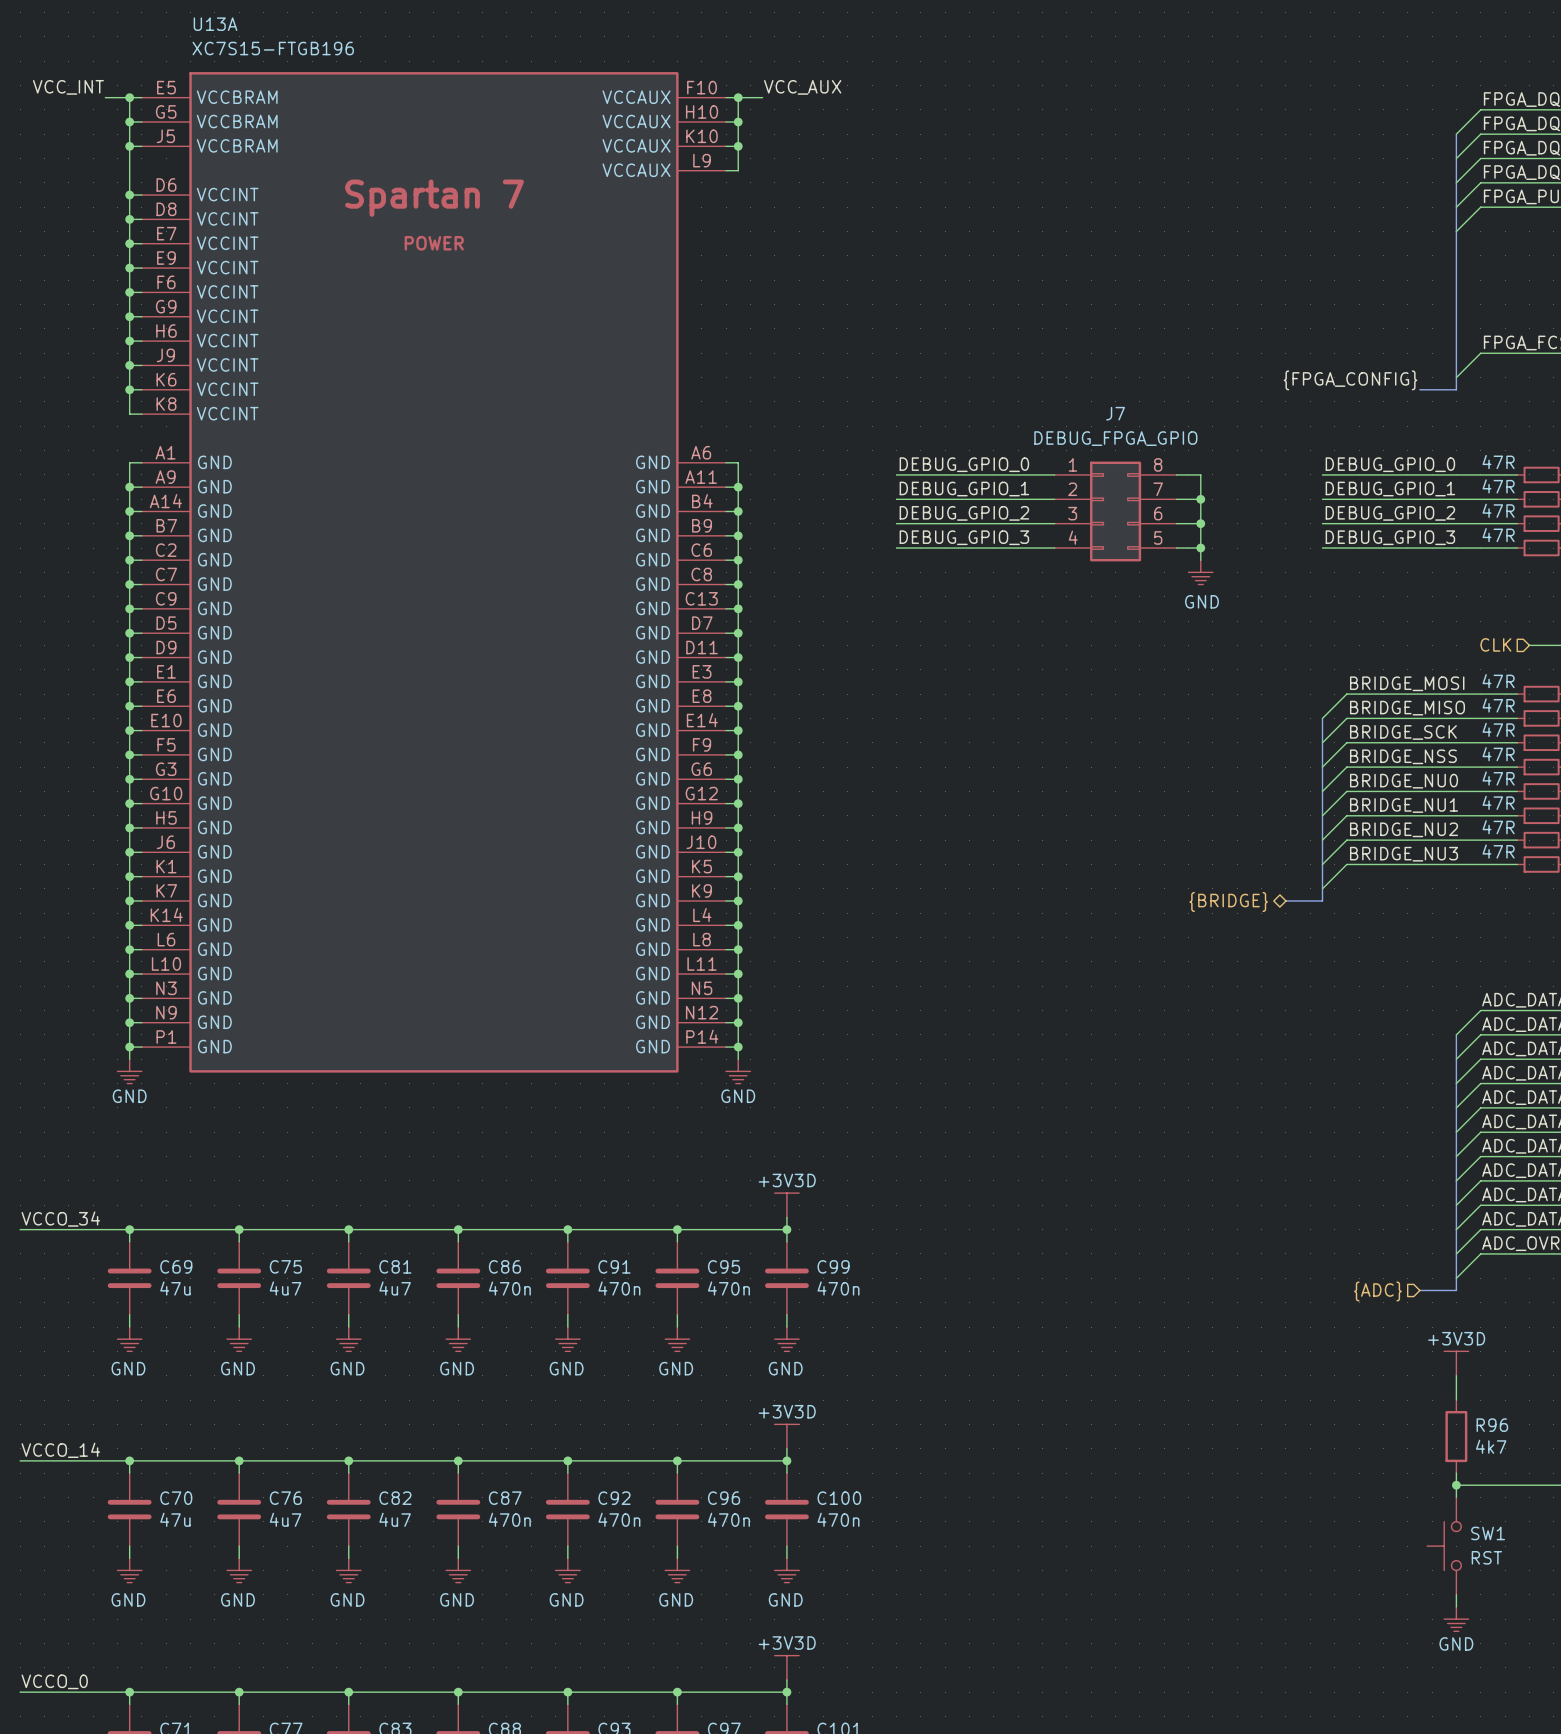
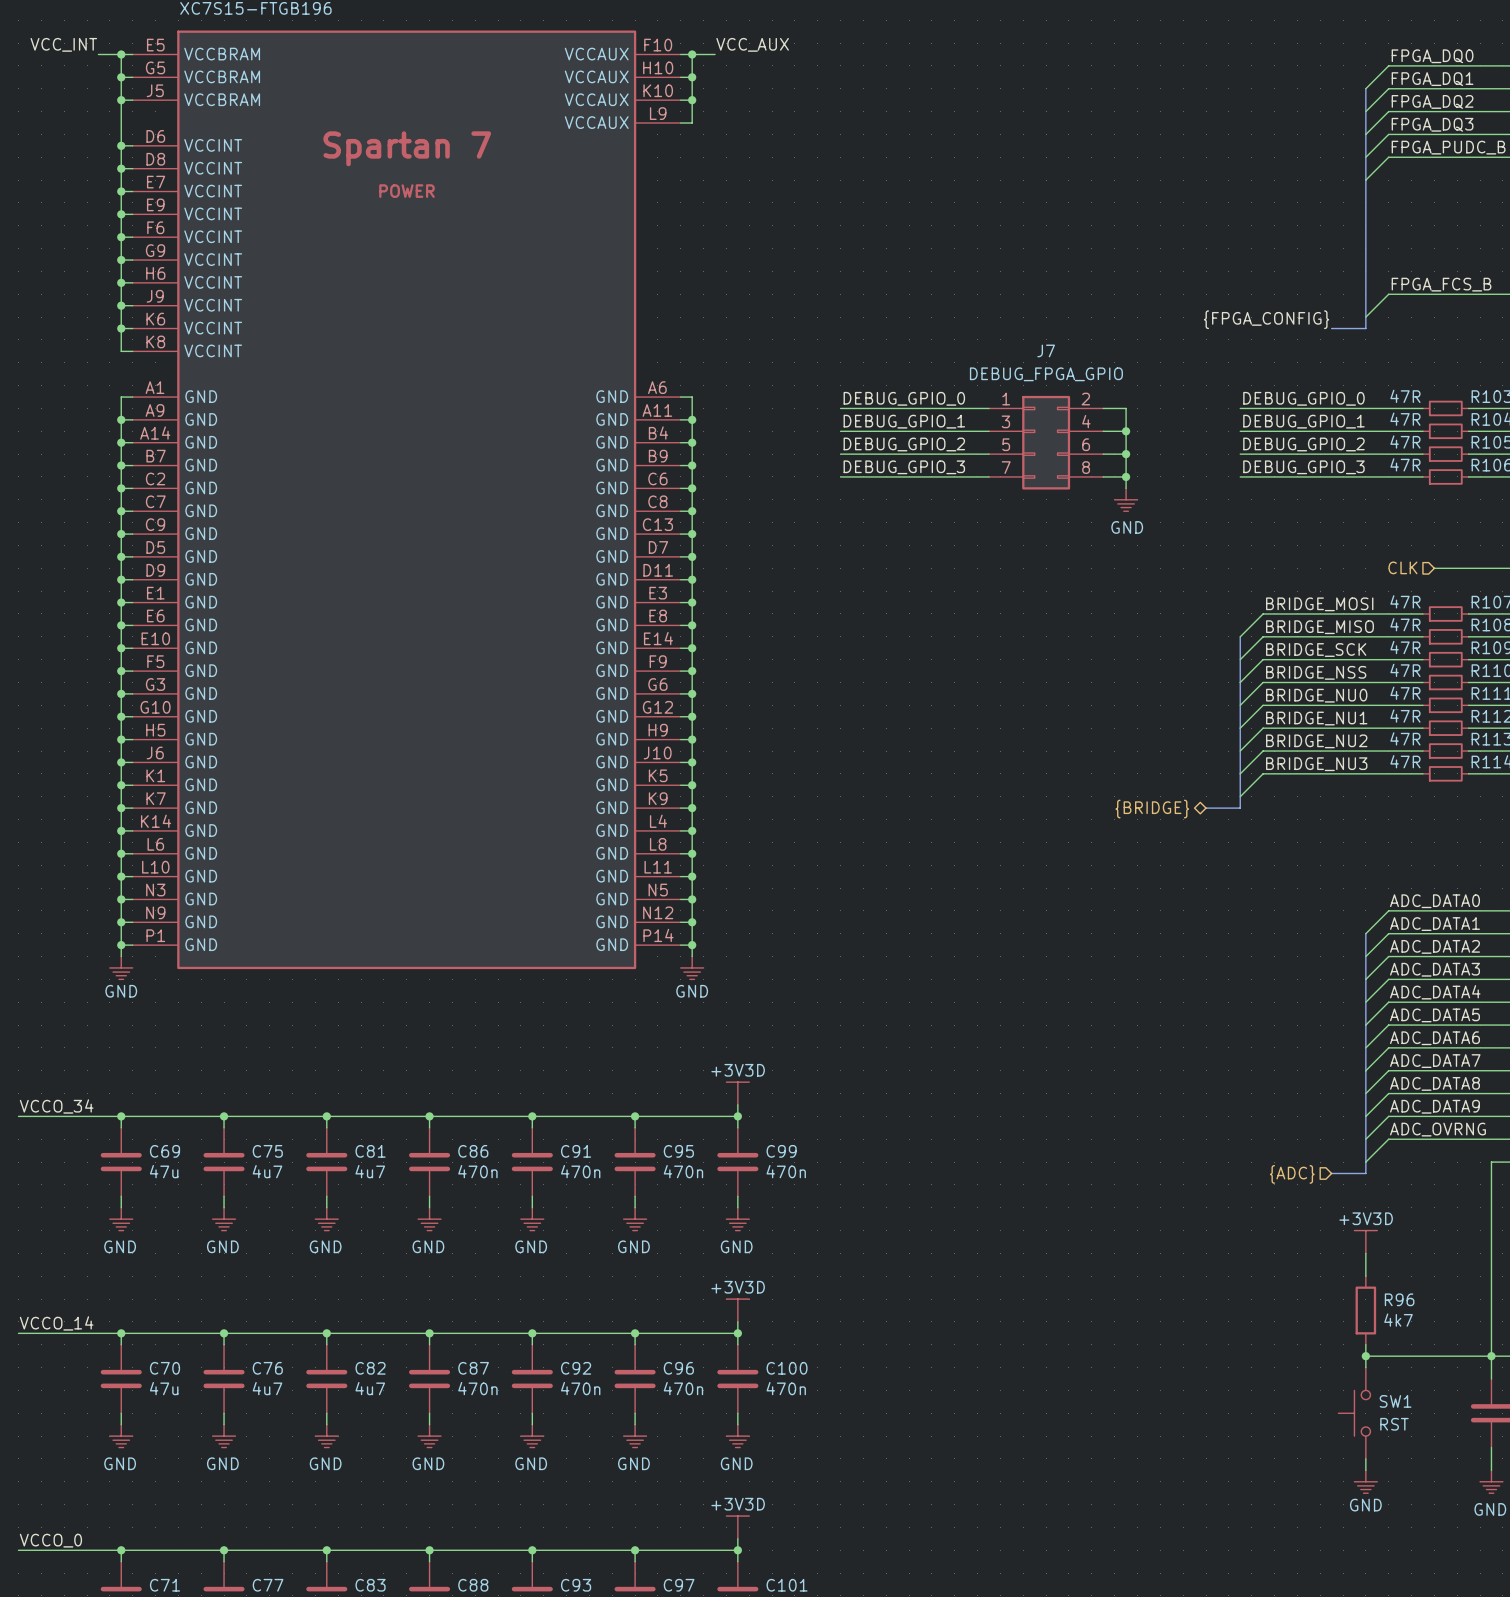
J7 pin number: 8 (1158, 464) -> 2 (1085, 399)
J7 pin number: 2 (1072, 489) -> 3 (1005, 421)
J7 pin number: 7 (1158, 489) -> 4 (1086, 421)
J7 pin number: 3 (1072, 513) -> 5 (1006, 444)
J7 pin number: 4 (1073, 537) -> 7 (1006, 467)
J7 pin number: 5 (1158, 537) -> 8 (1086, 467)

